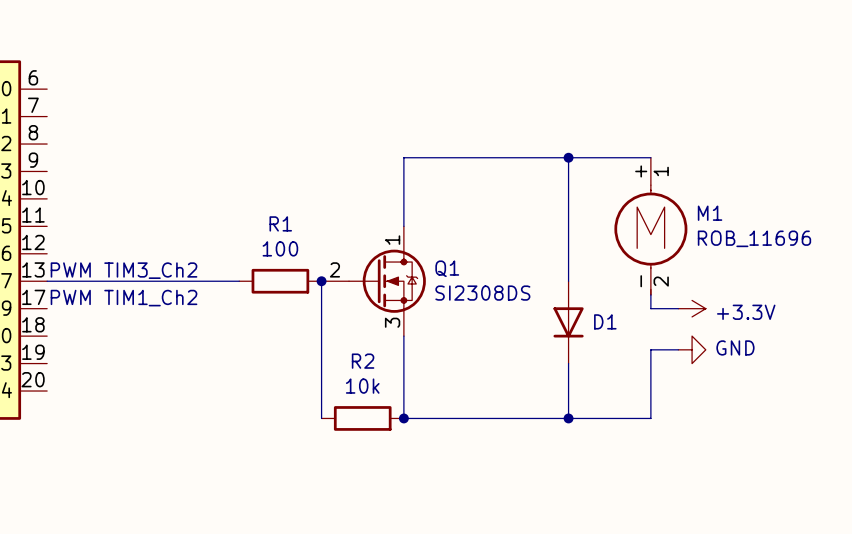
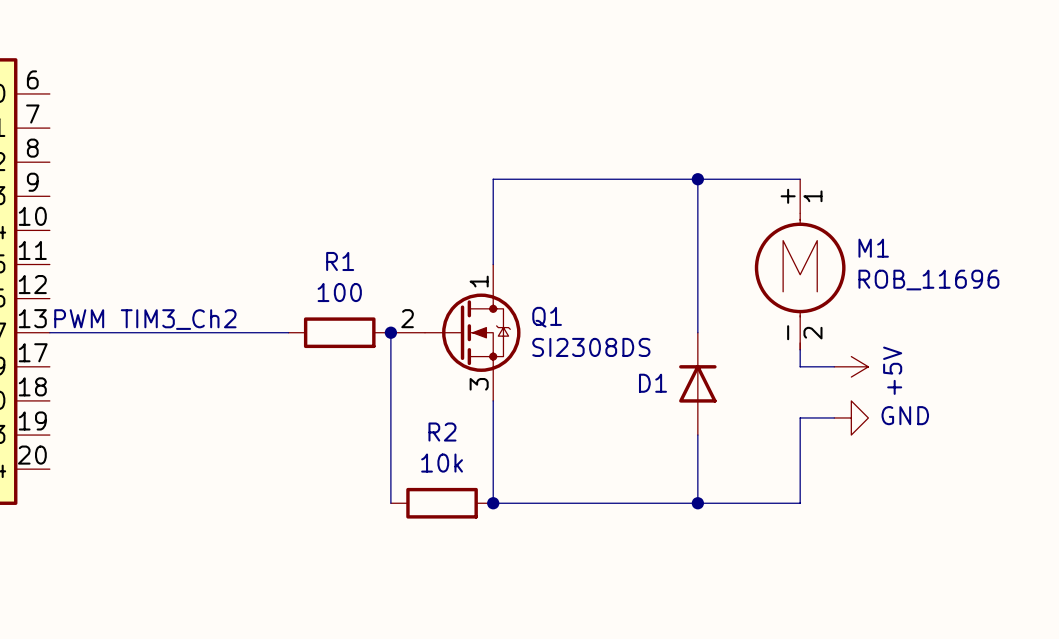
text: PWM TIM1_Ch2 (124, 298) -> none
power symbol: +3.3V (692, 308) -> +5V (851, 366)
D1 rotation: 0° (568, 322) -> 180° (697, 383)

